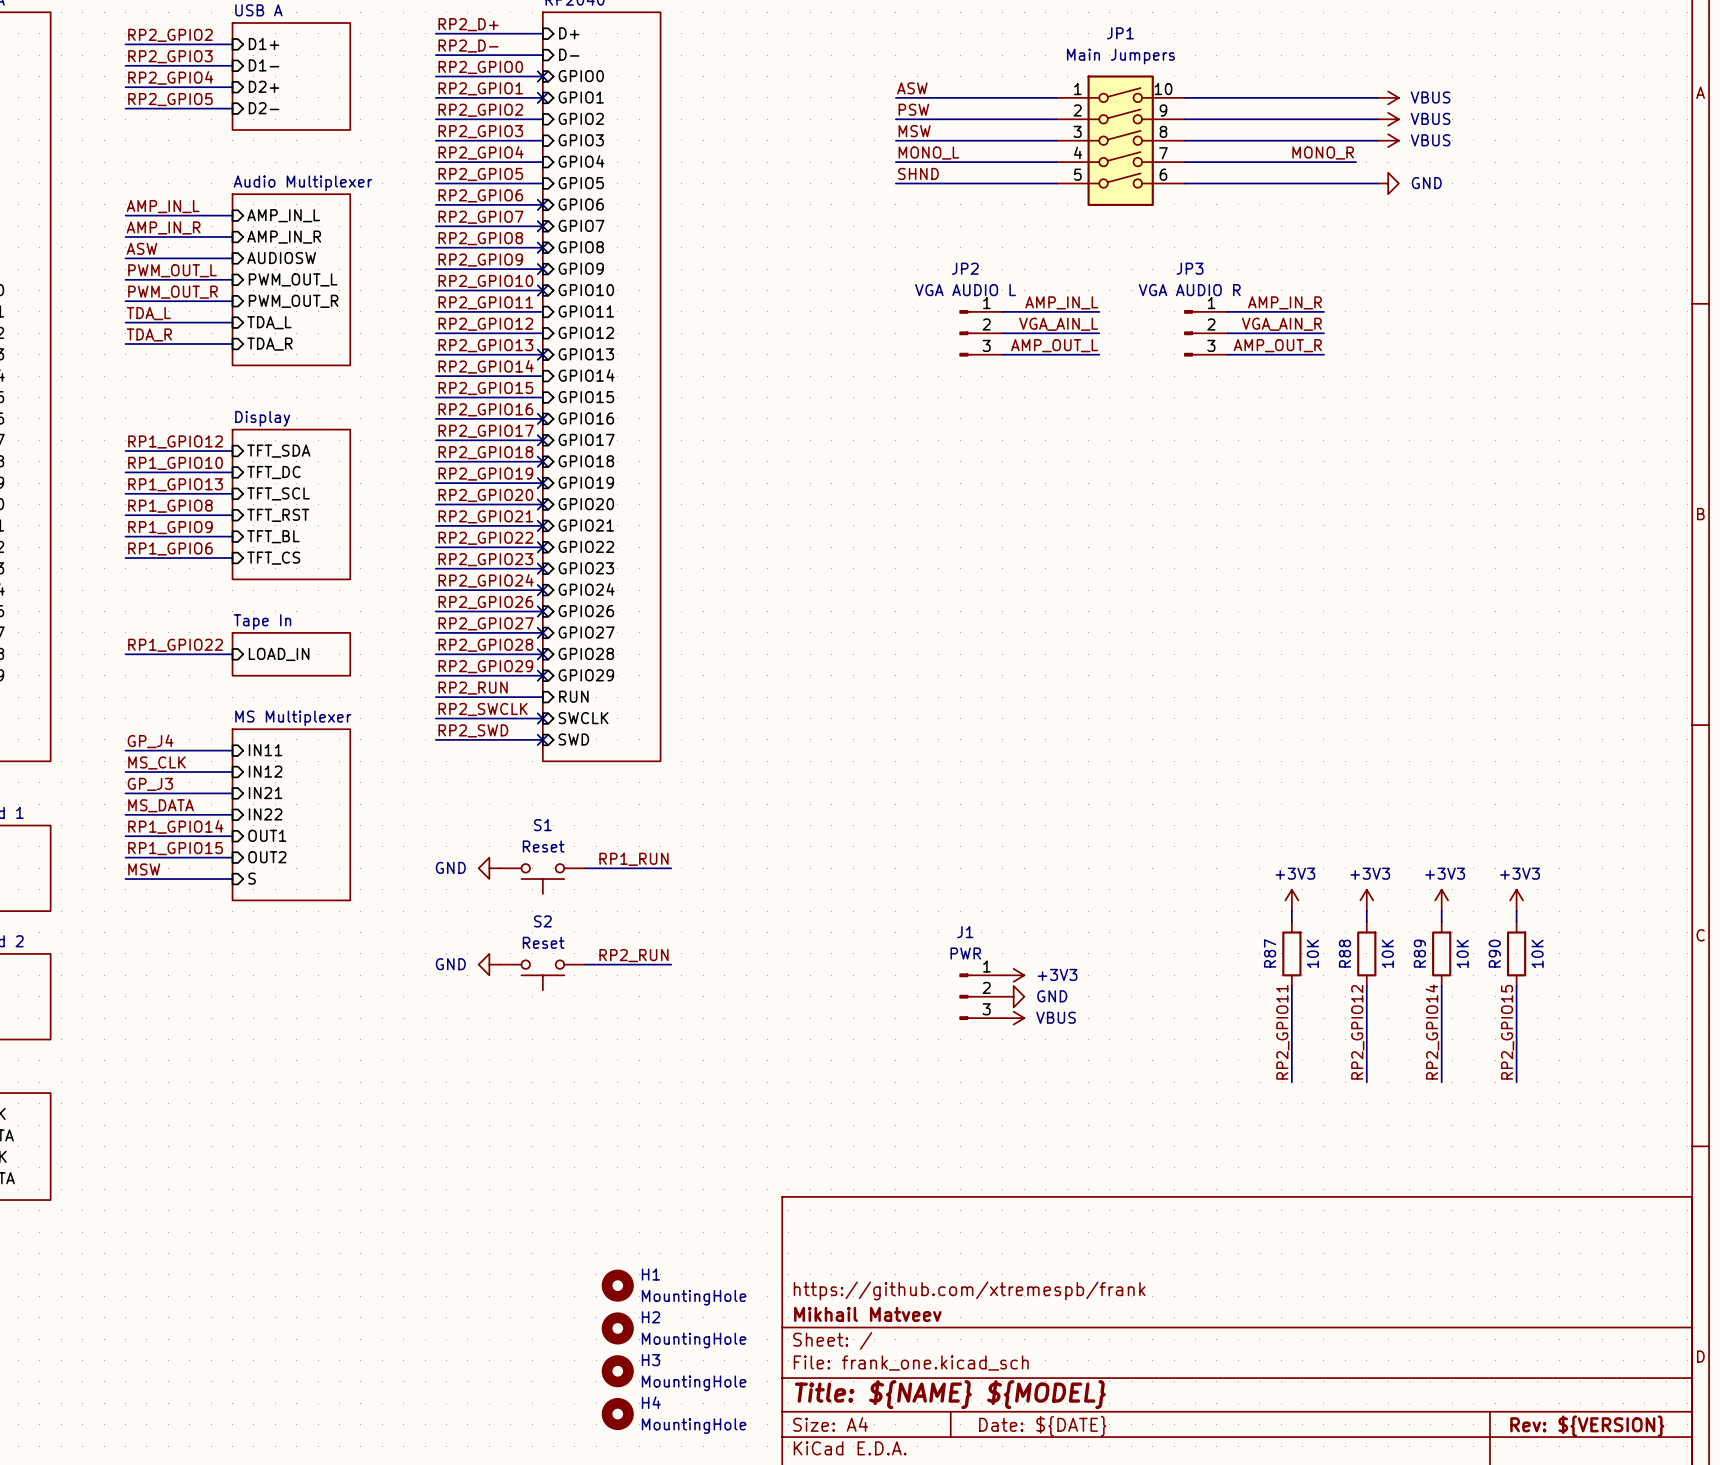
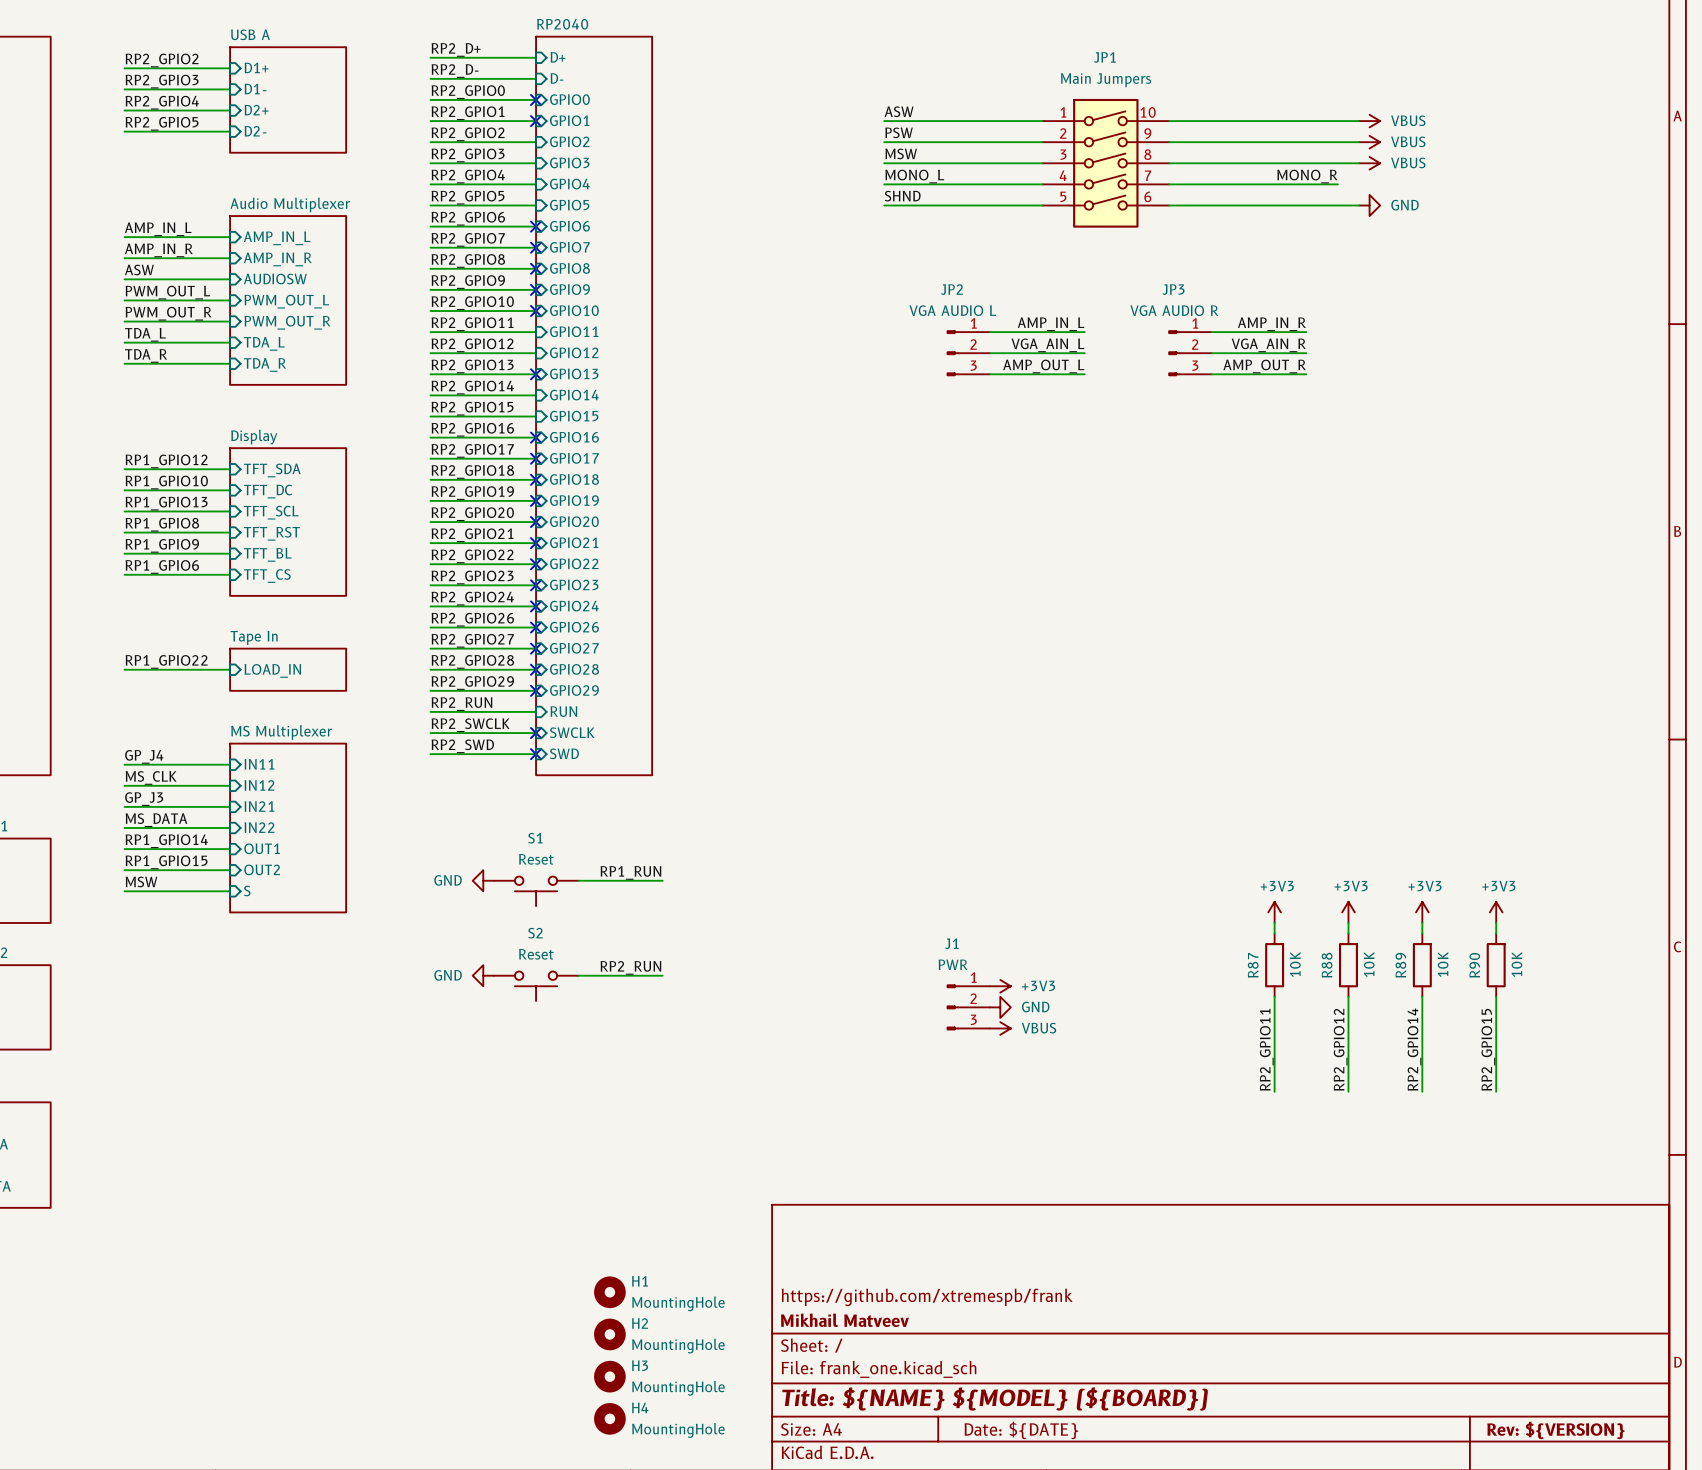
title block: Title: ${NAME} ${MODEL} (950, 1394) -> Title: ${NAME} ${MODEL} (${BOARD}) (995, 1398)

